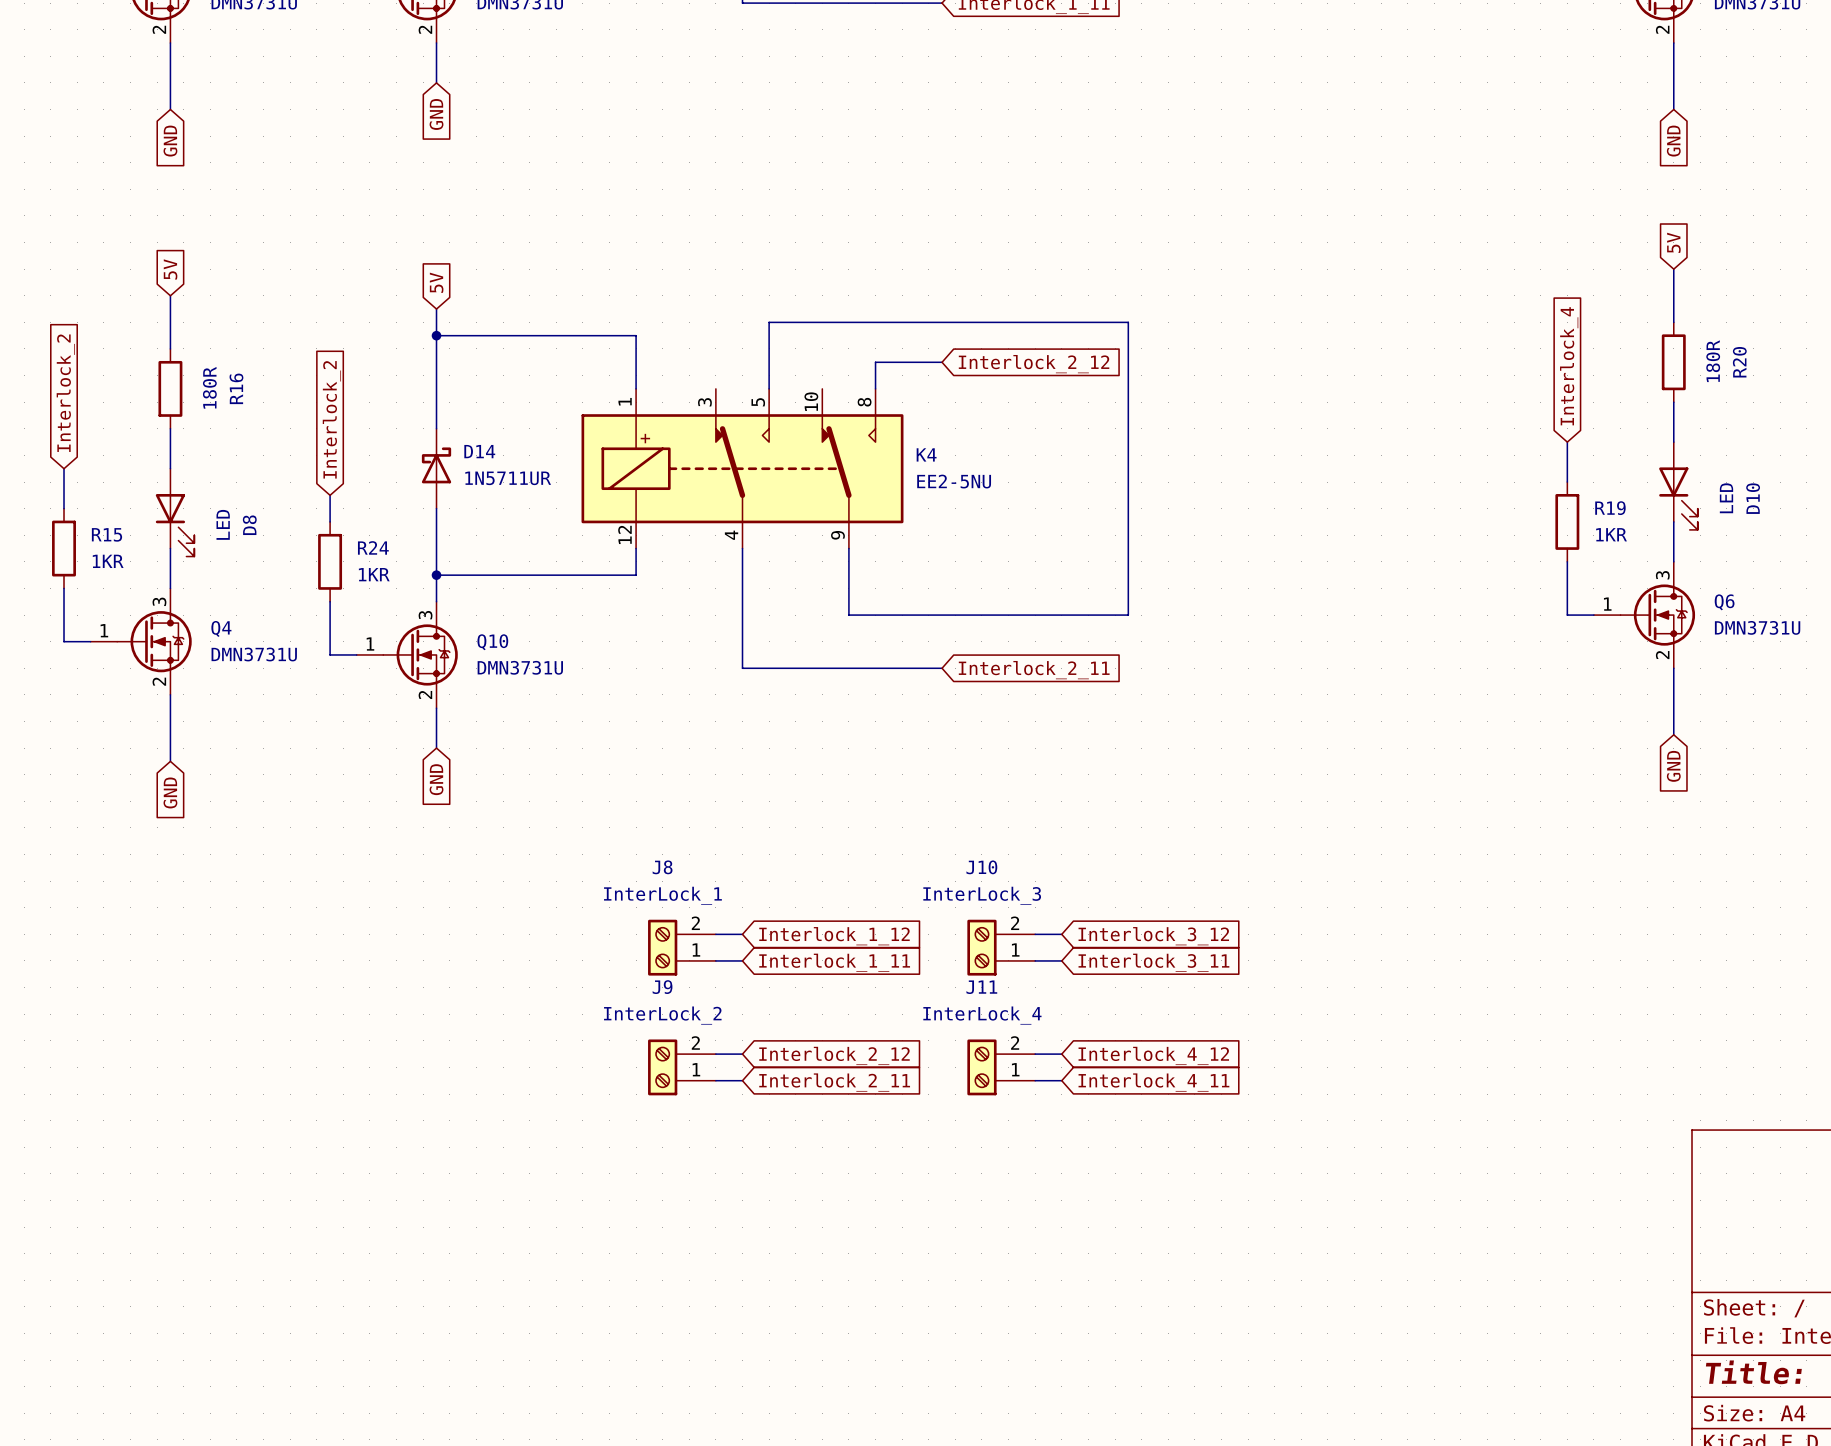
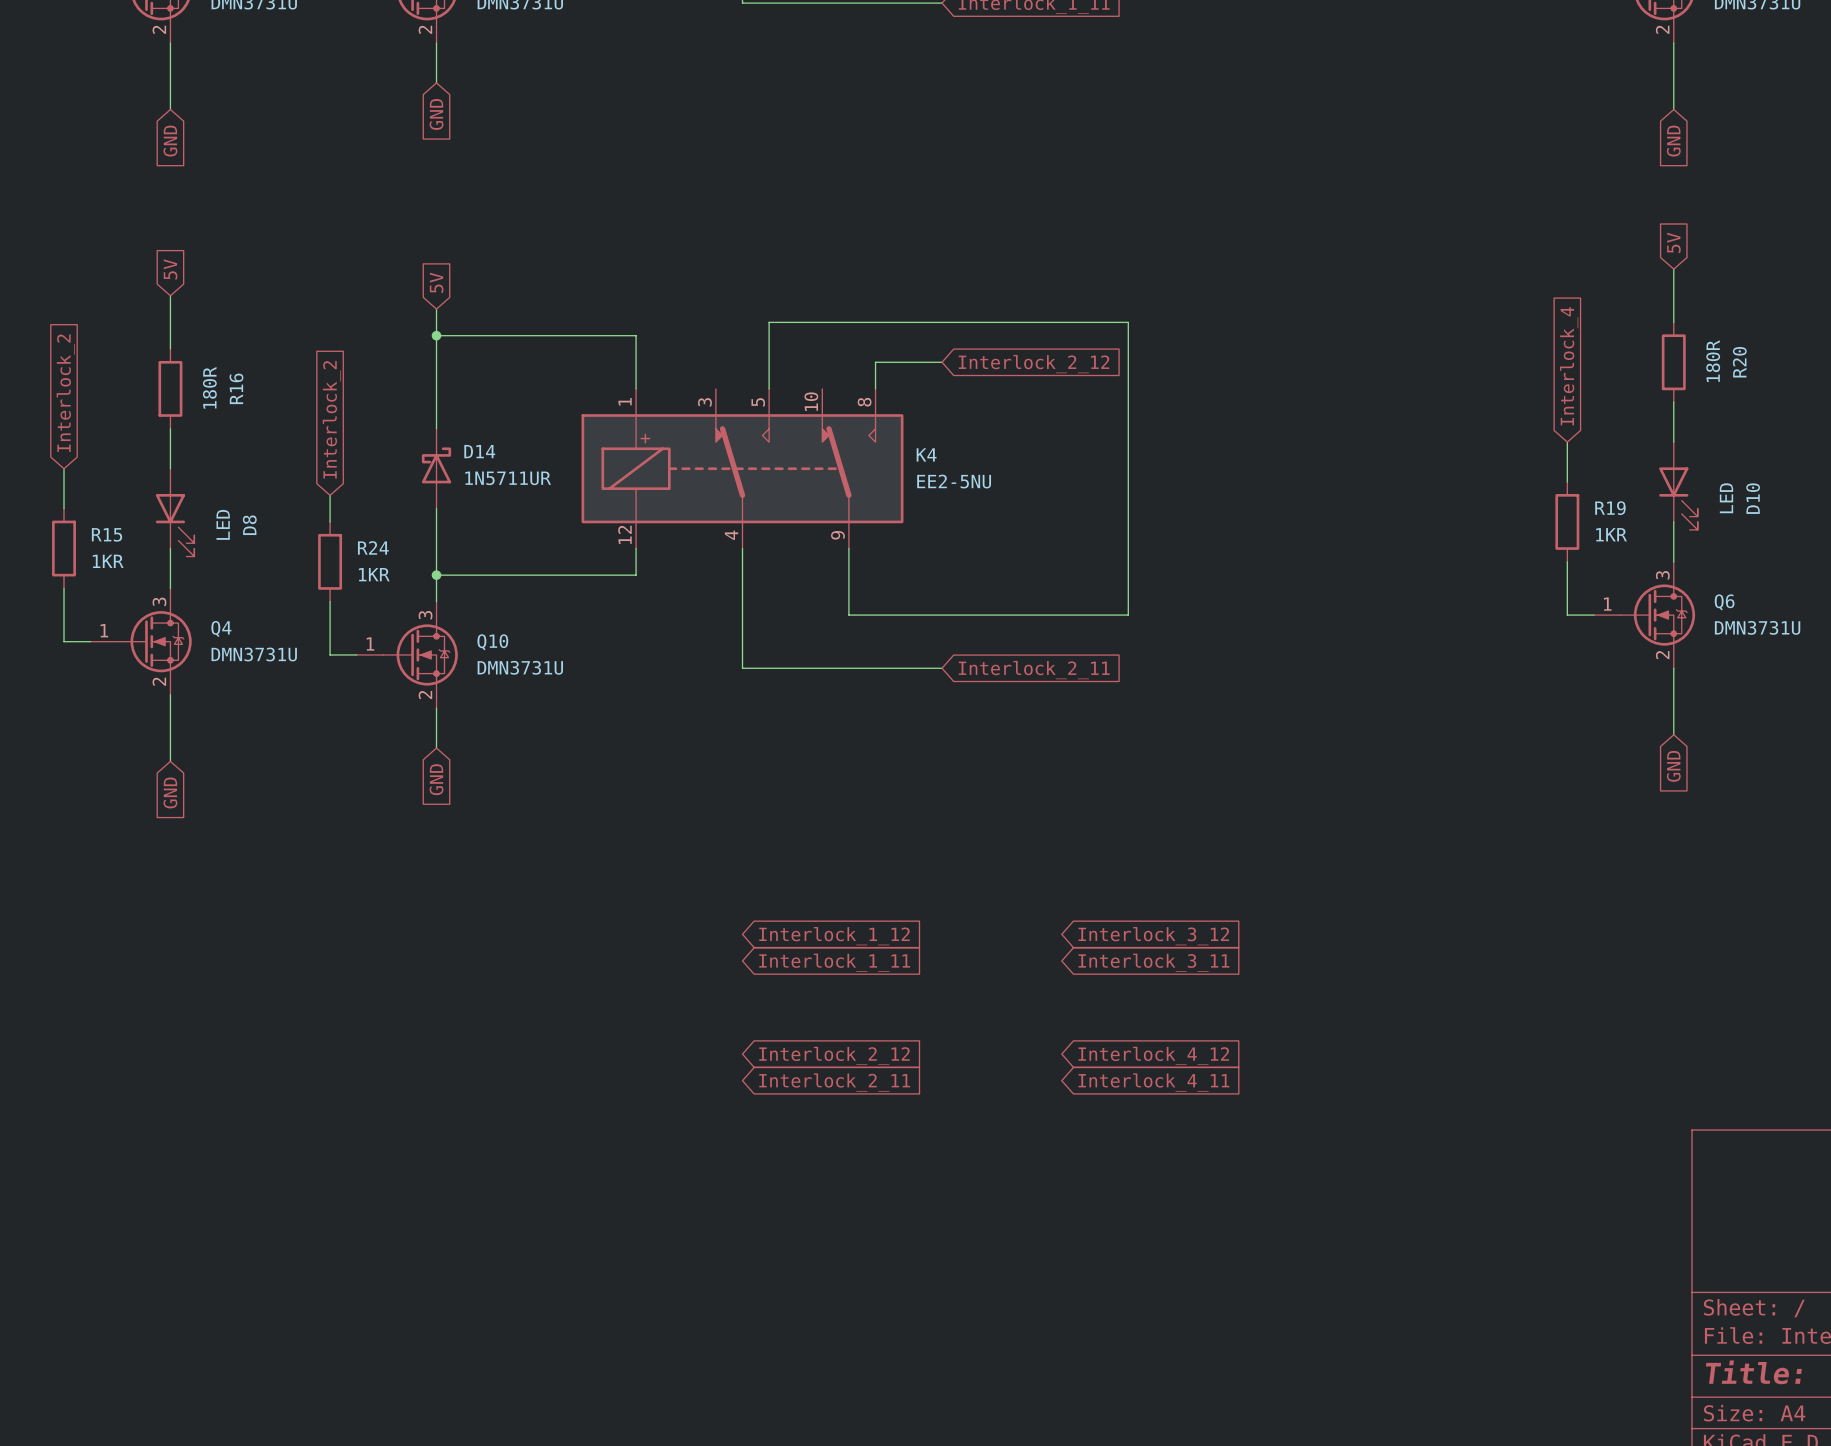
wire: (715, 934) (742, 934) -> none
wire: (1035, 934) (1061, 934) -> none
J8: InterLock_1 (681, 947) -> none
J10: InterLock_3 (1001, 947) -> none
wire: (715, 960) (742, 960) -> none
wire: (1035, 960) (1061, 960) -> none
wire: (715, 1054) (742, 1054) -> none
wire: (1035, 1054) (1061, 1054) -> none
J9: InterLock_2 (681, 1067) -> none
J11: InterLock_4 (1001, 1067) -> none
wire: (715, 1080) (742, 1080) -> none
wire: (1035, 1080) (1061, 1080) -> none

